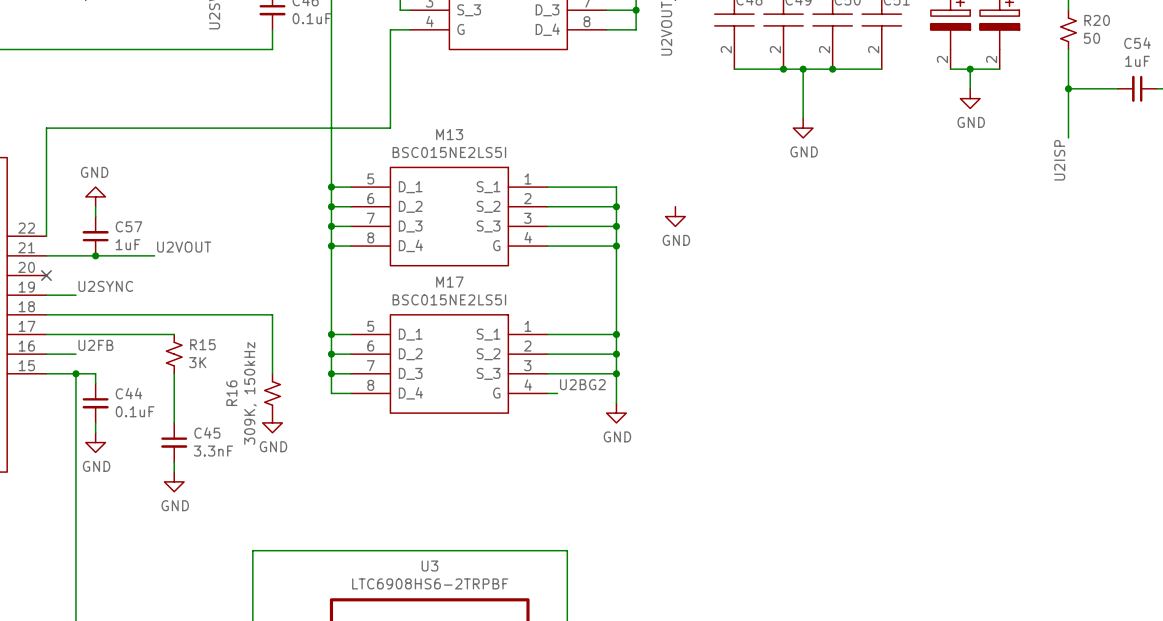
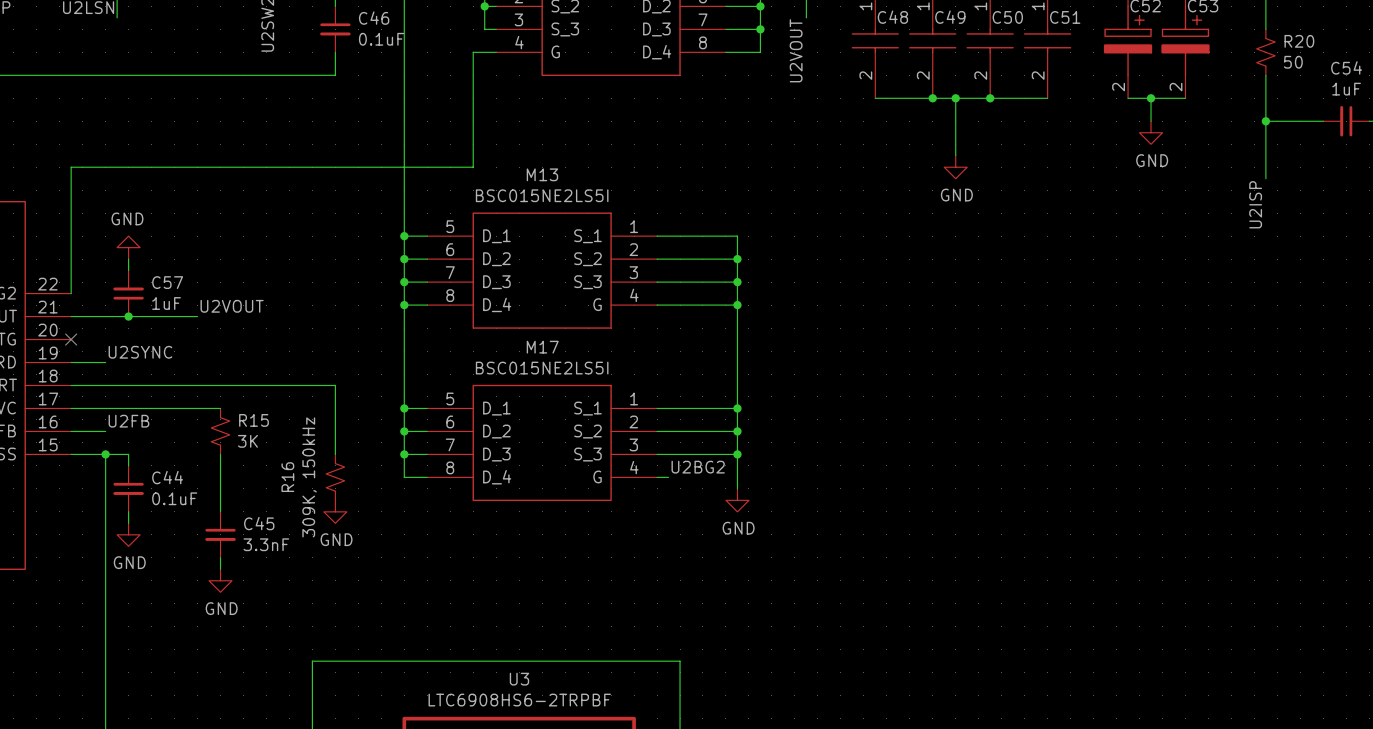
power symbol: GND (675, 216) -> none

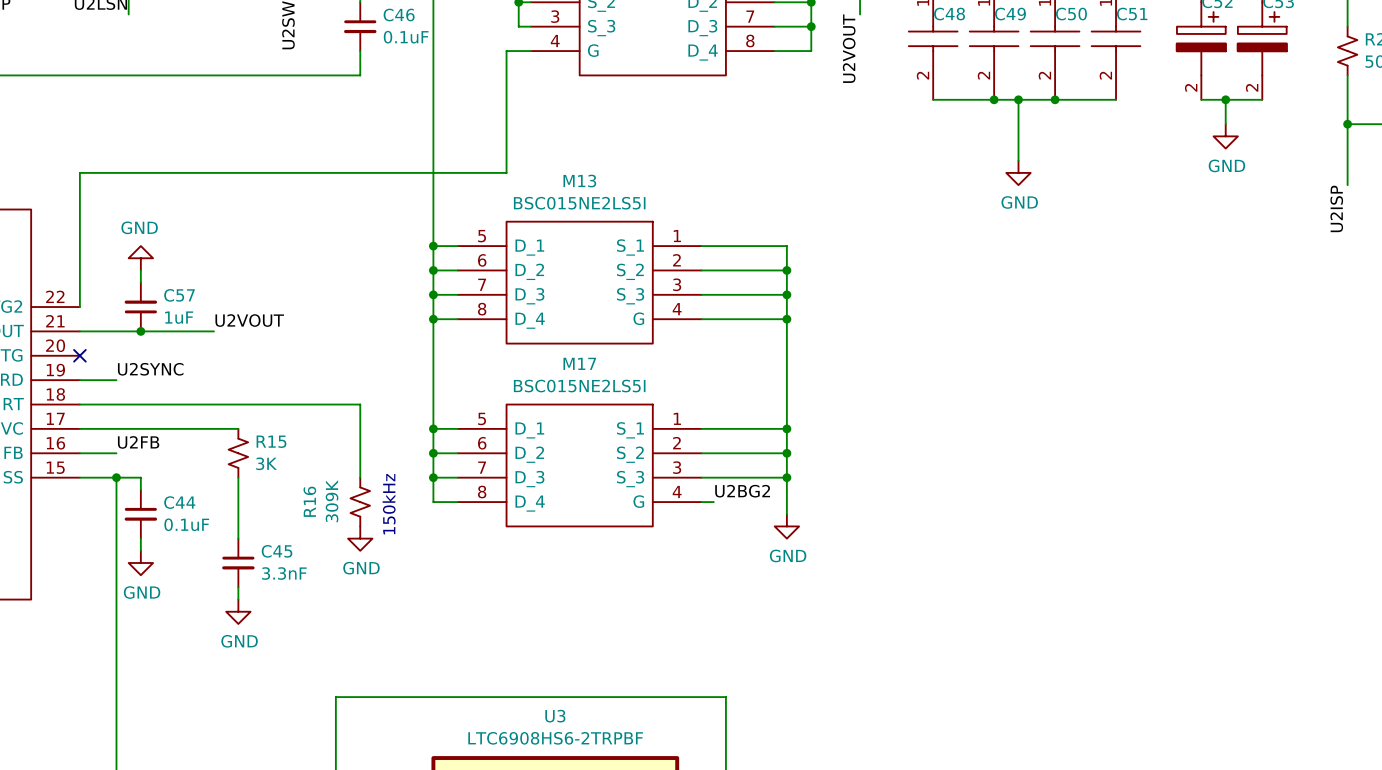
text: none -> 150kHz (389, 504)
R16 value: 309K, 150kHz (309, 477) -> 309K (332, 501)

